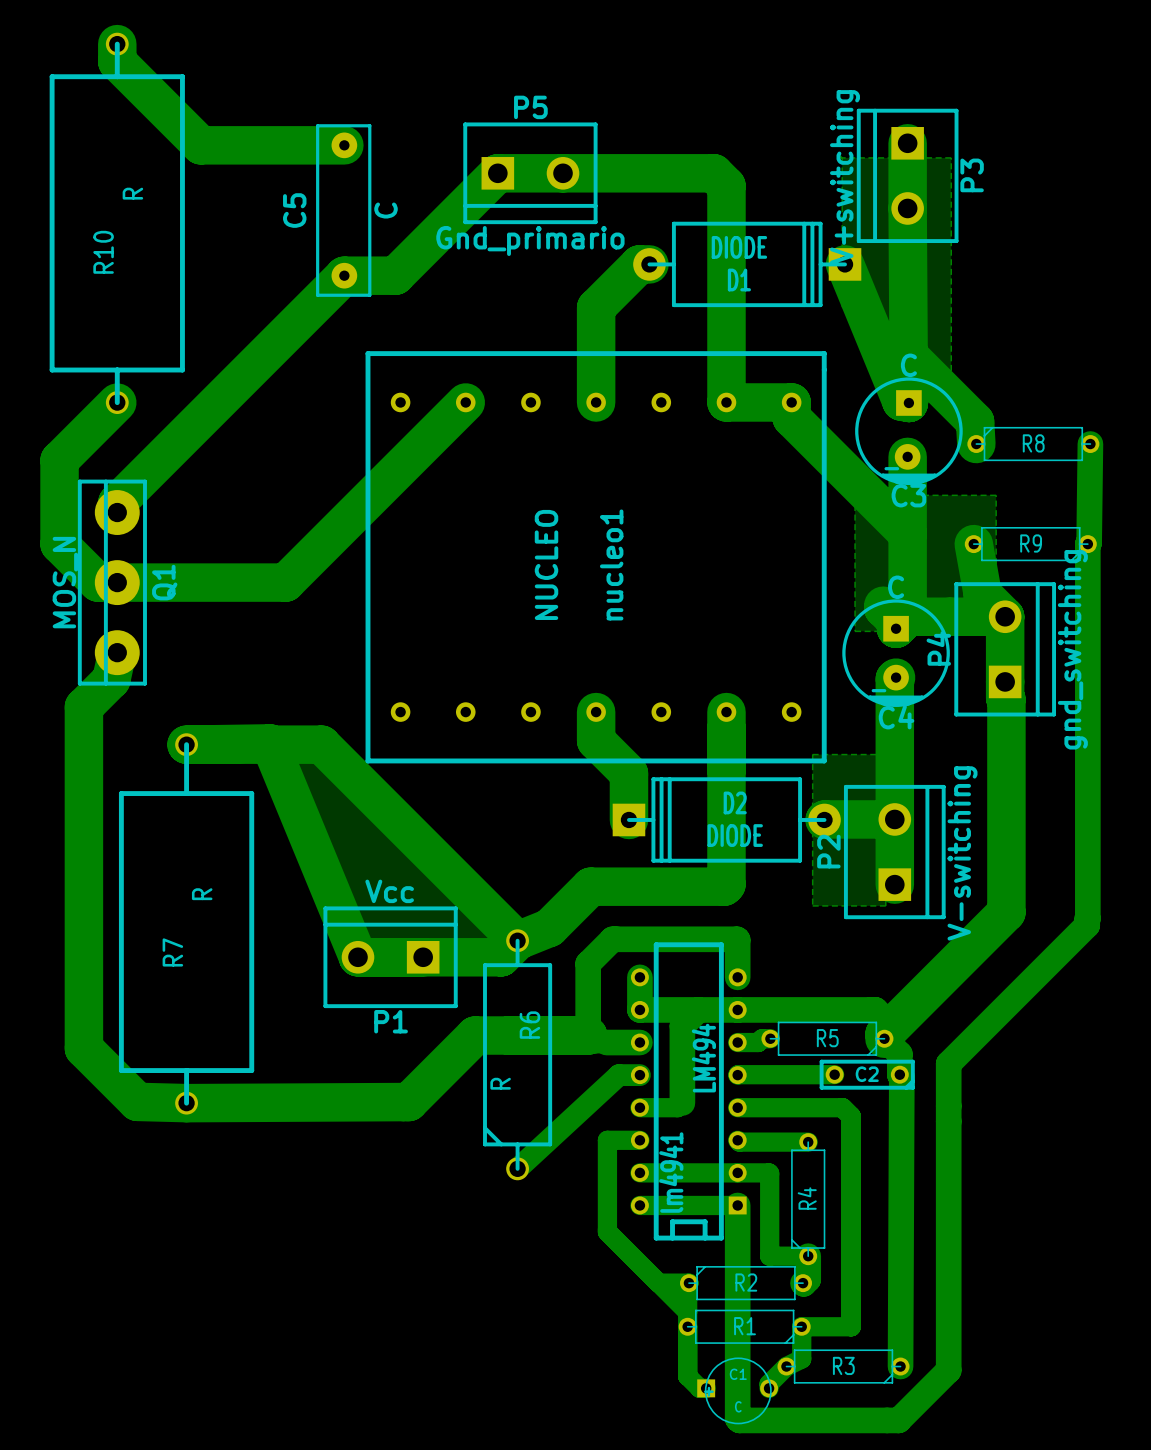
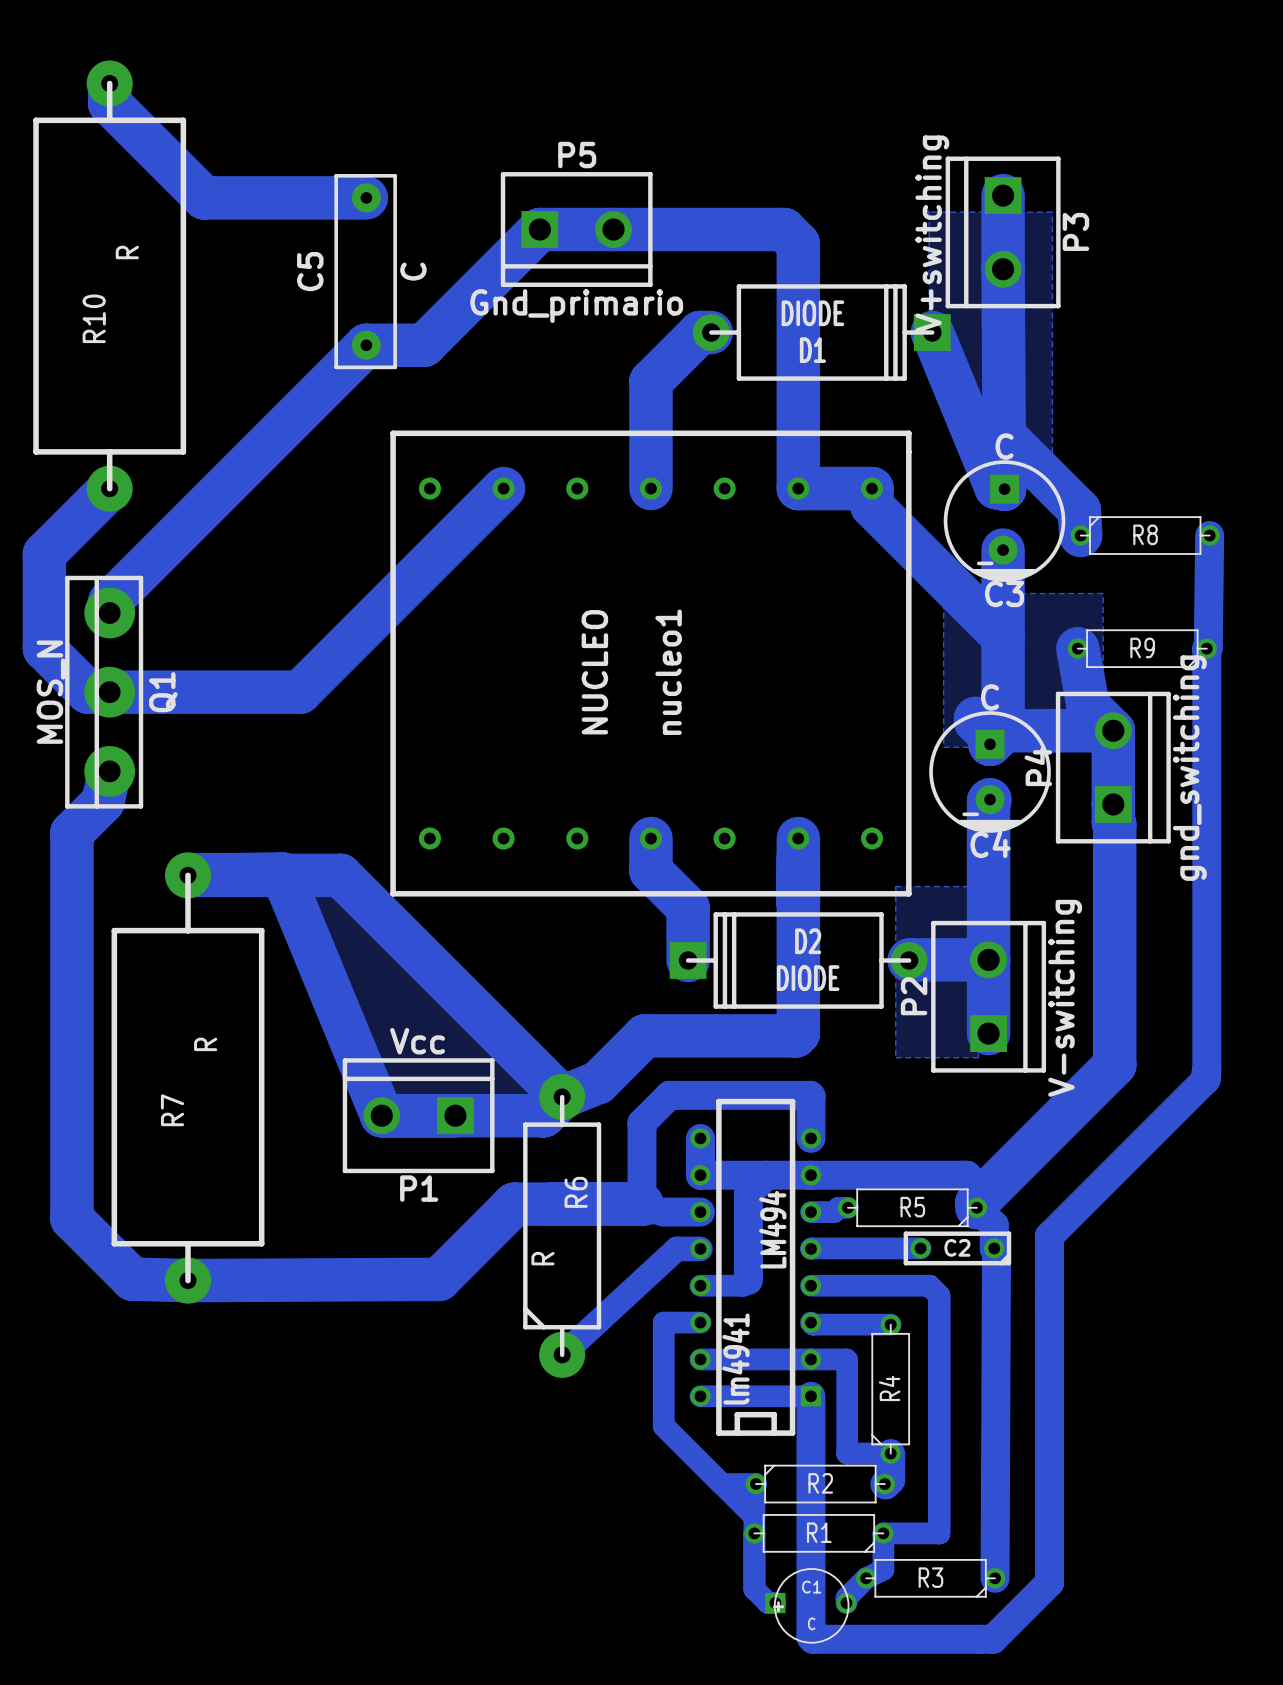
R10 footprint: [49, 32, 185, 415] -> [33, 60, 187, 512]
R7 footprint: [118, 733, 255, 1115] -> [111, 852, 265, 1304]
R6 footprint: [483, 929, 553, 1181] -> [523, 1073, 602, 1378]

